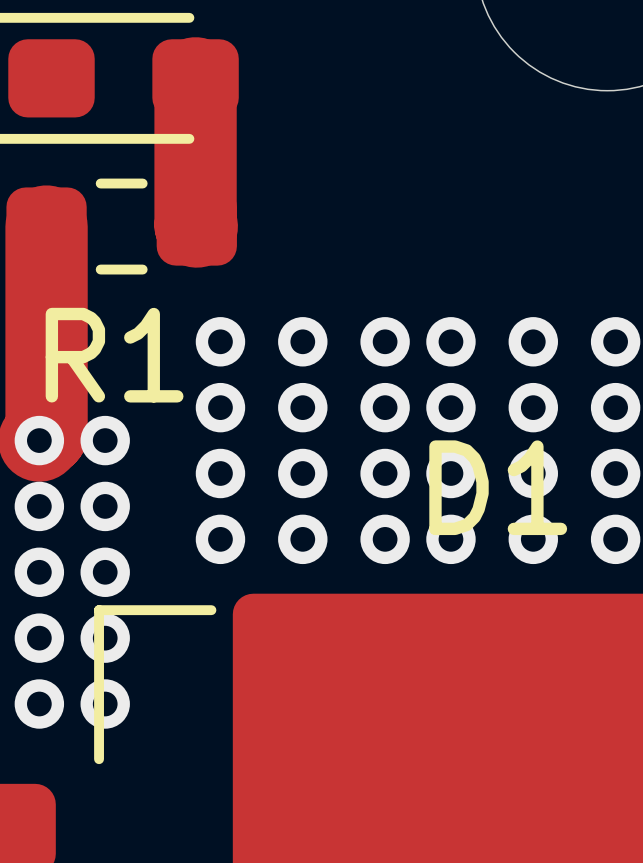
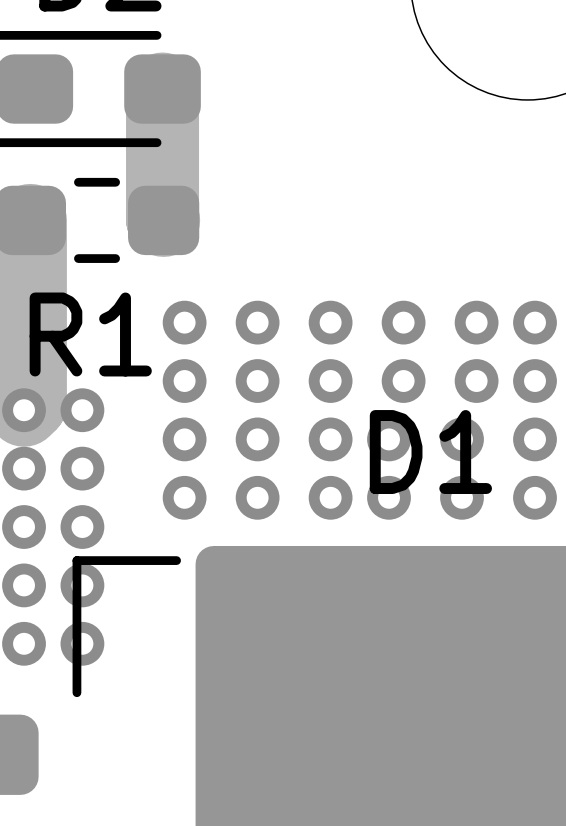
via position: (450, 341) -> (403, 322)
via position: (533, 341) -> (476, 322)
via position: (450, 407) -> (403, 381)
via position: (533, 407) -> (476, 381)

